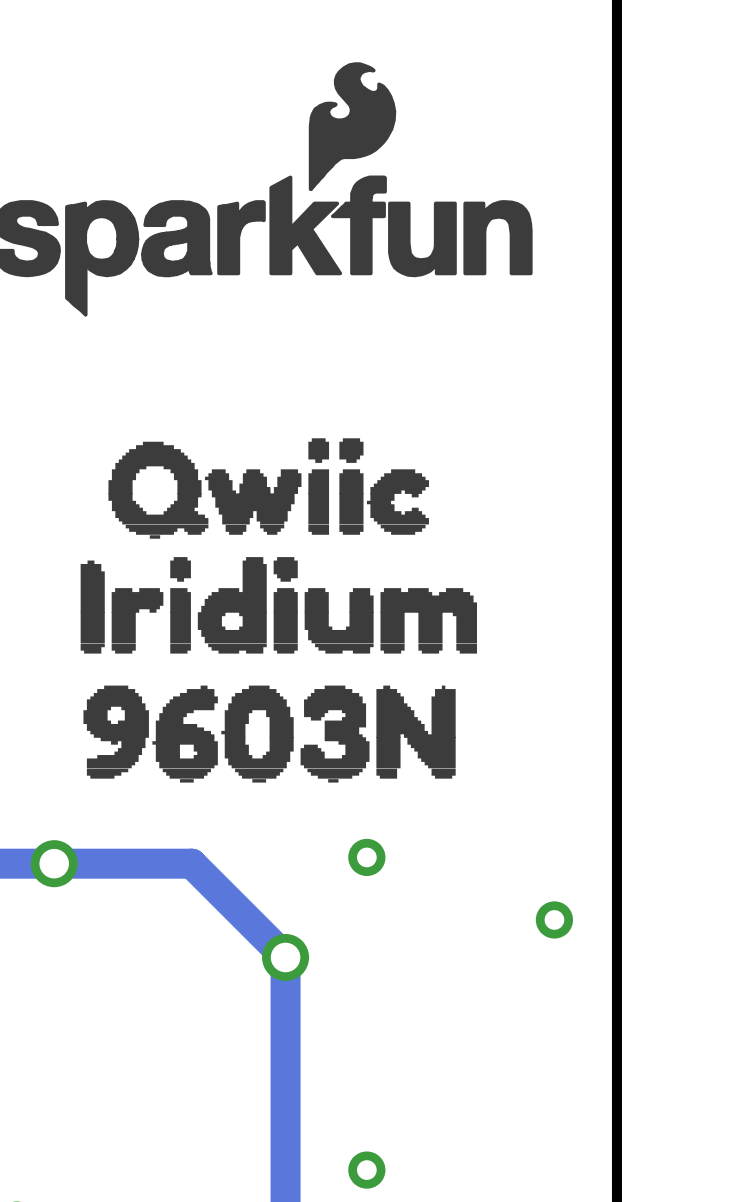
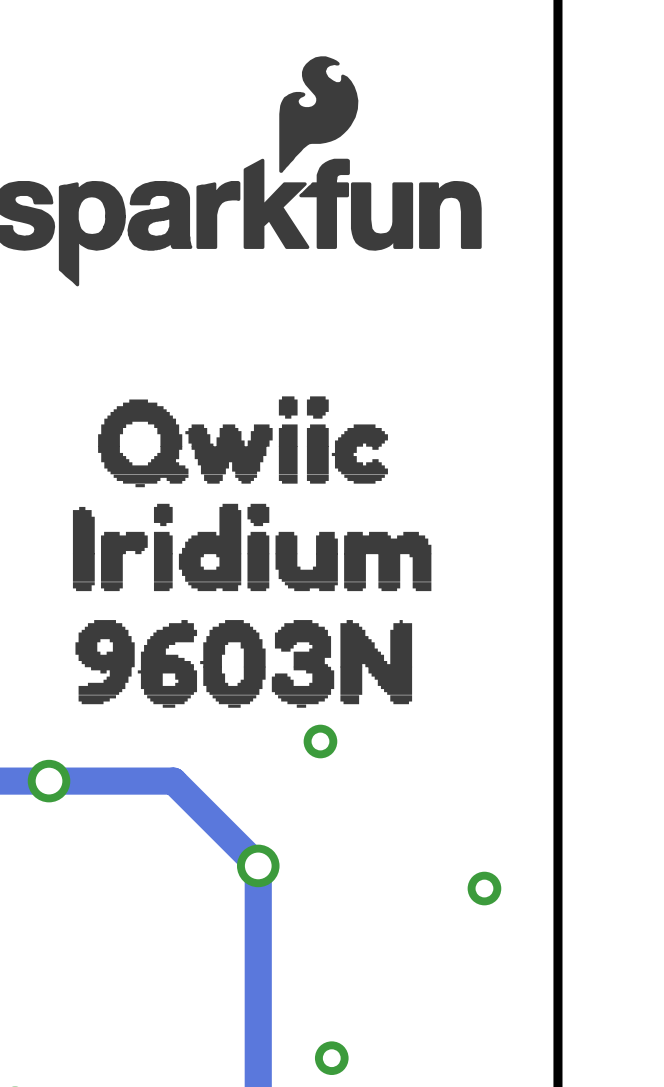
via position: (366, 857) -> (320, 741)
via position: (554, 919) -> (484, 888)

